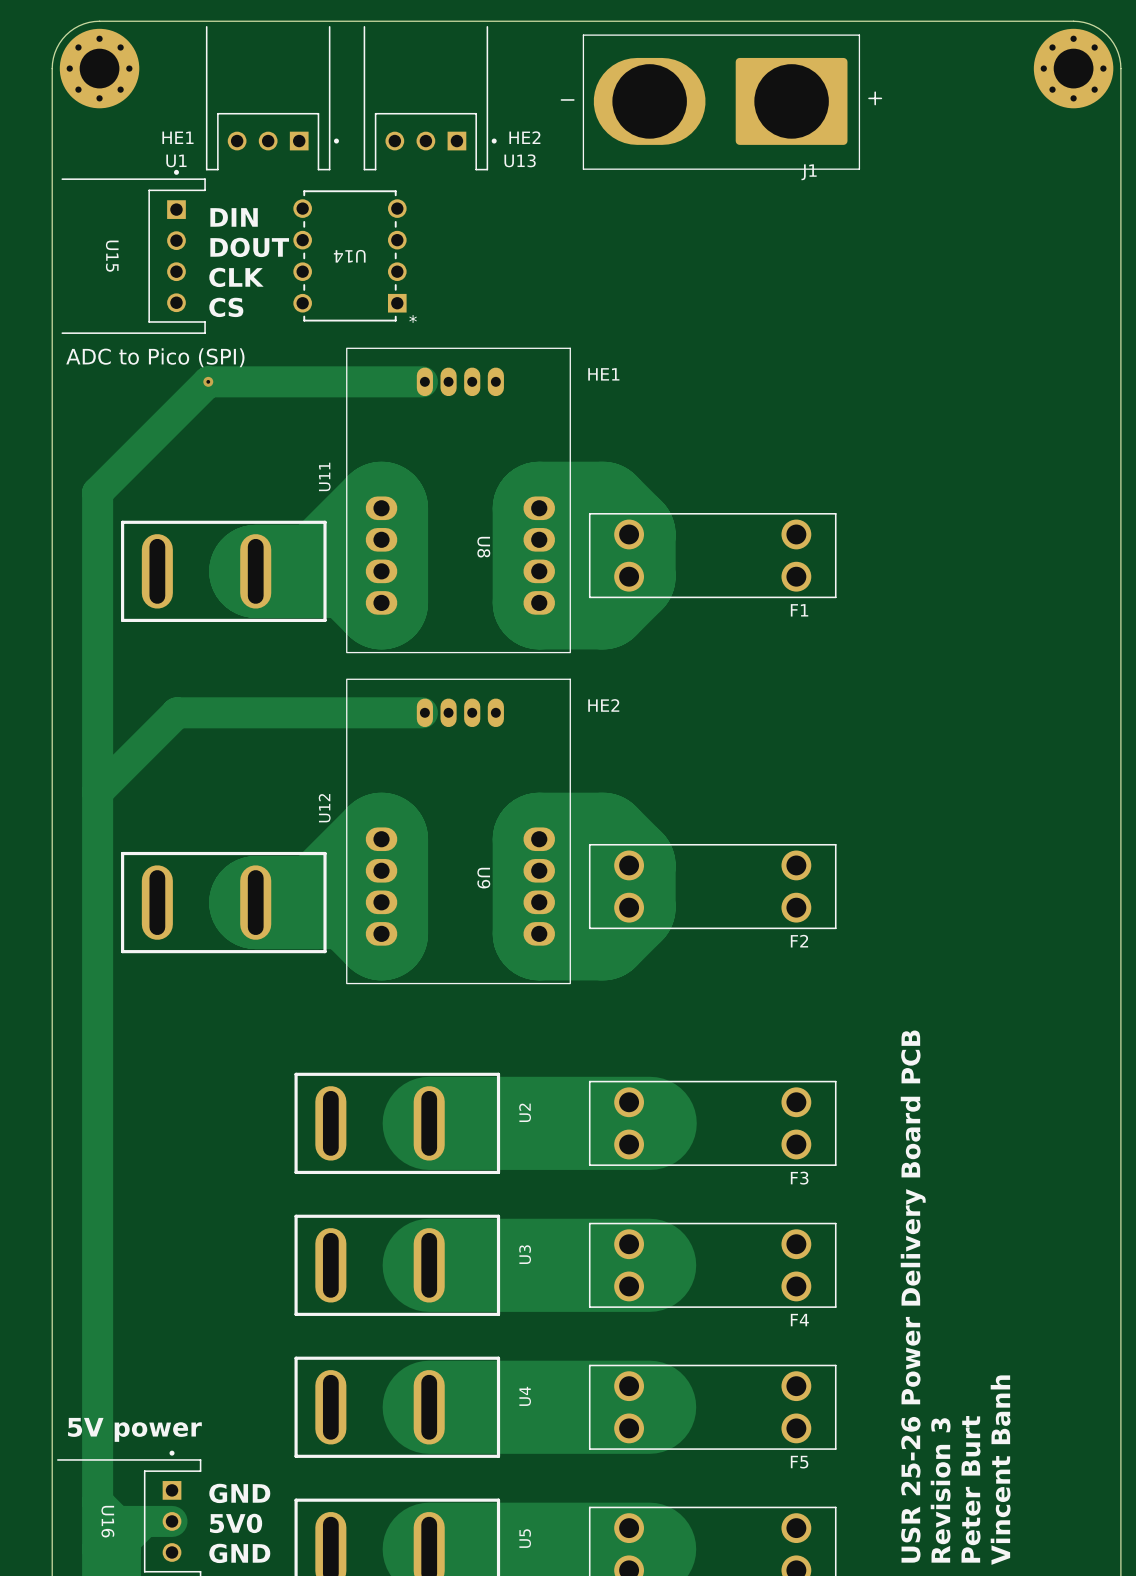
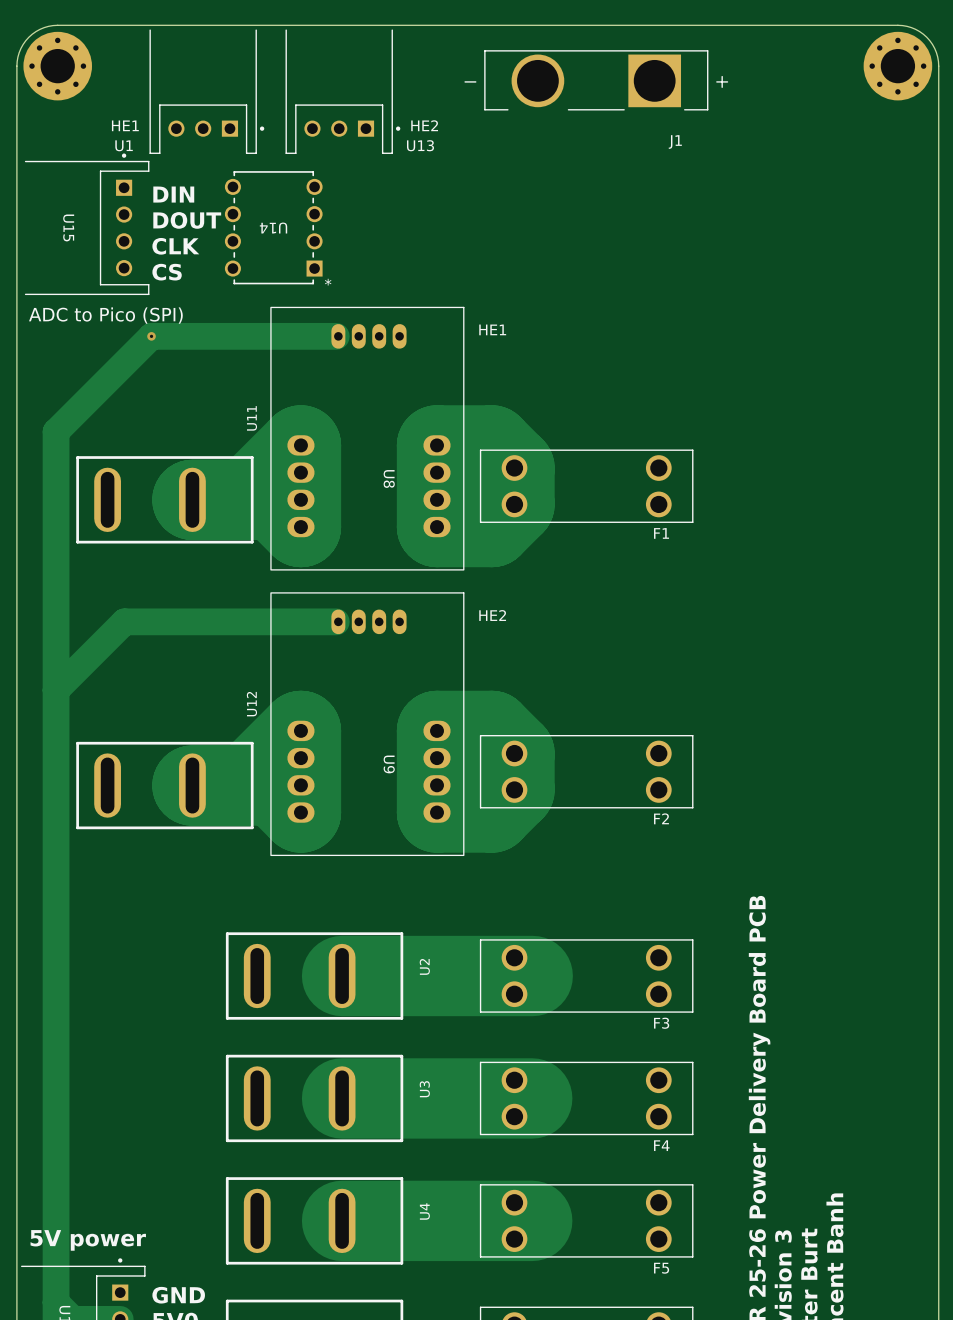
J1 footprint: [560, 34, 883, 170] -> [464, 50, 729, 111]

